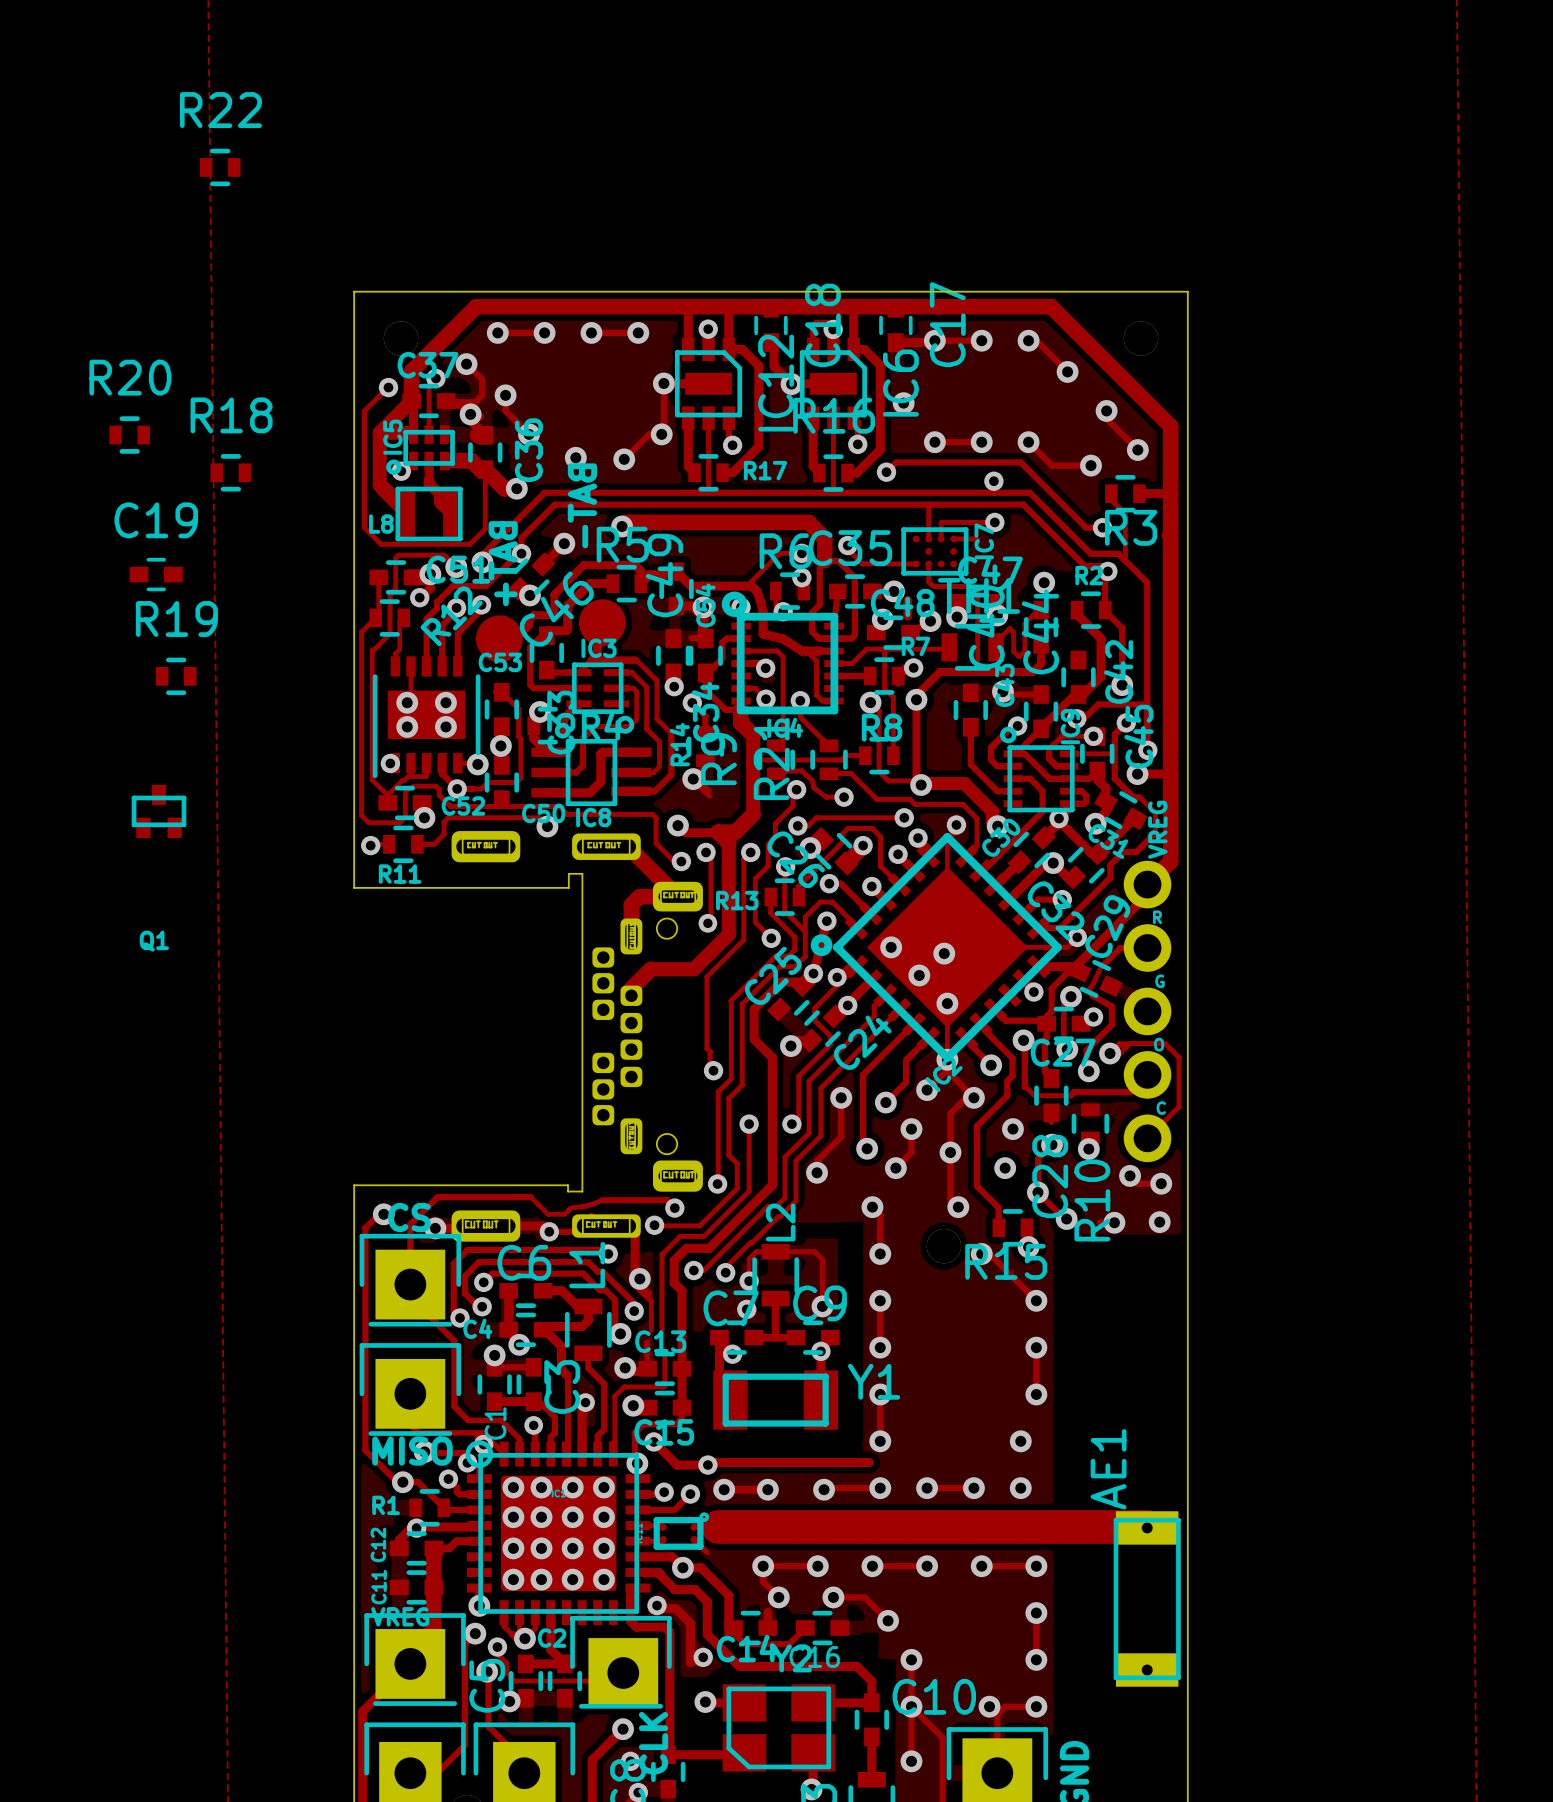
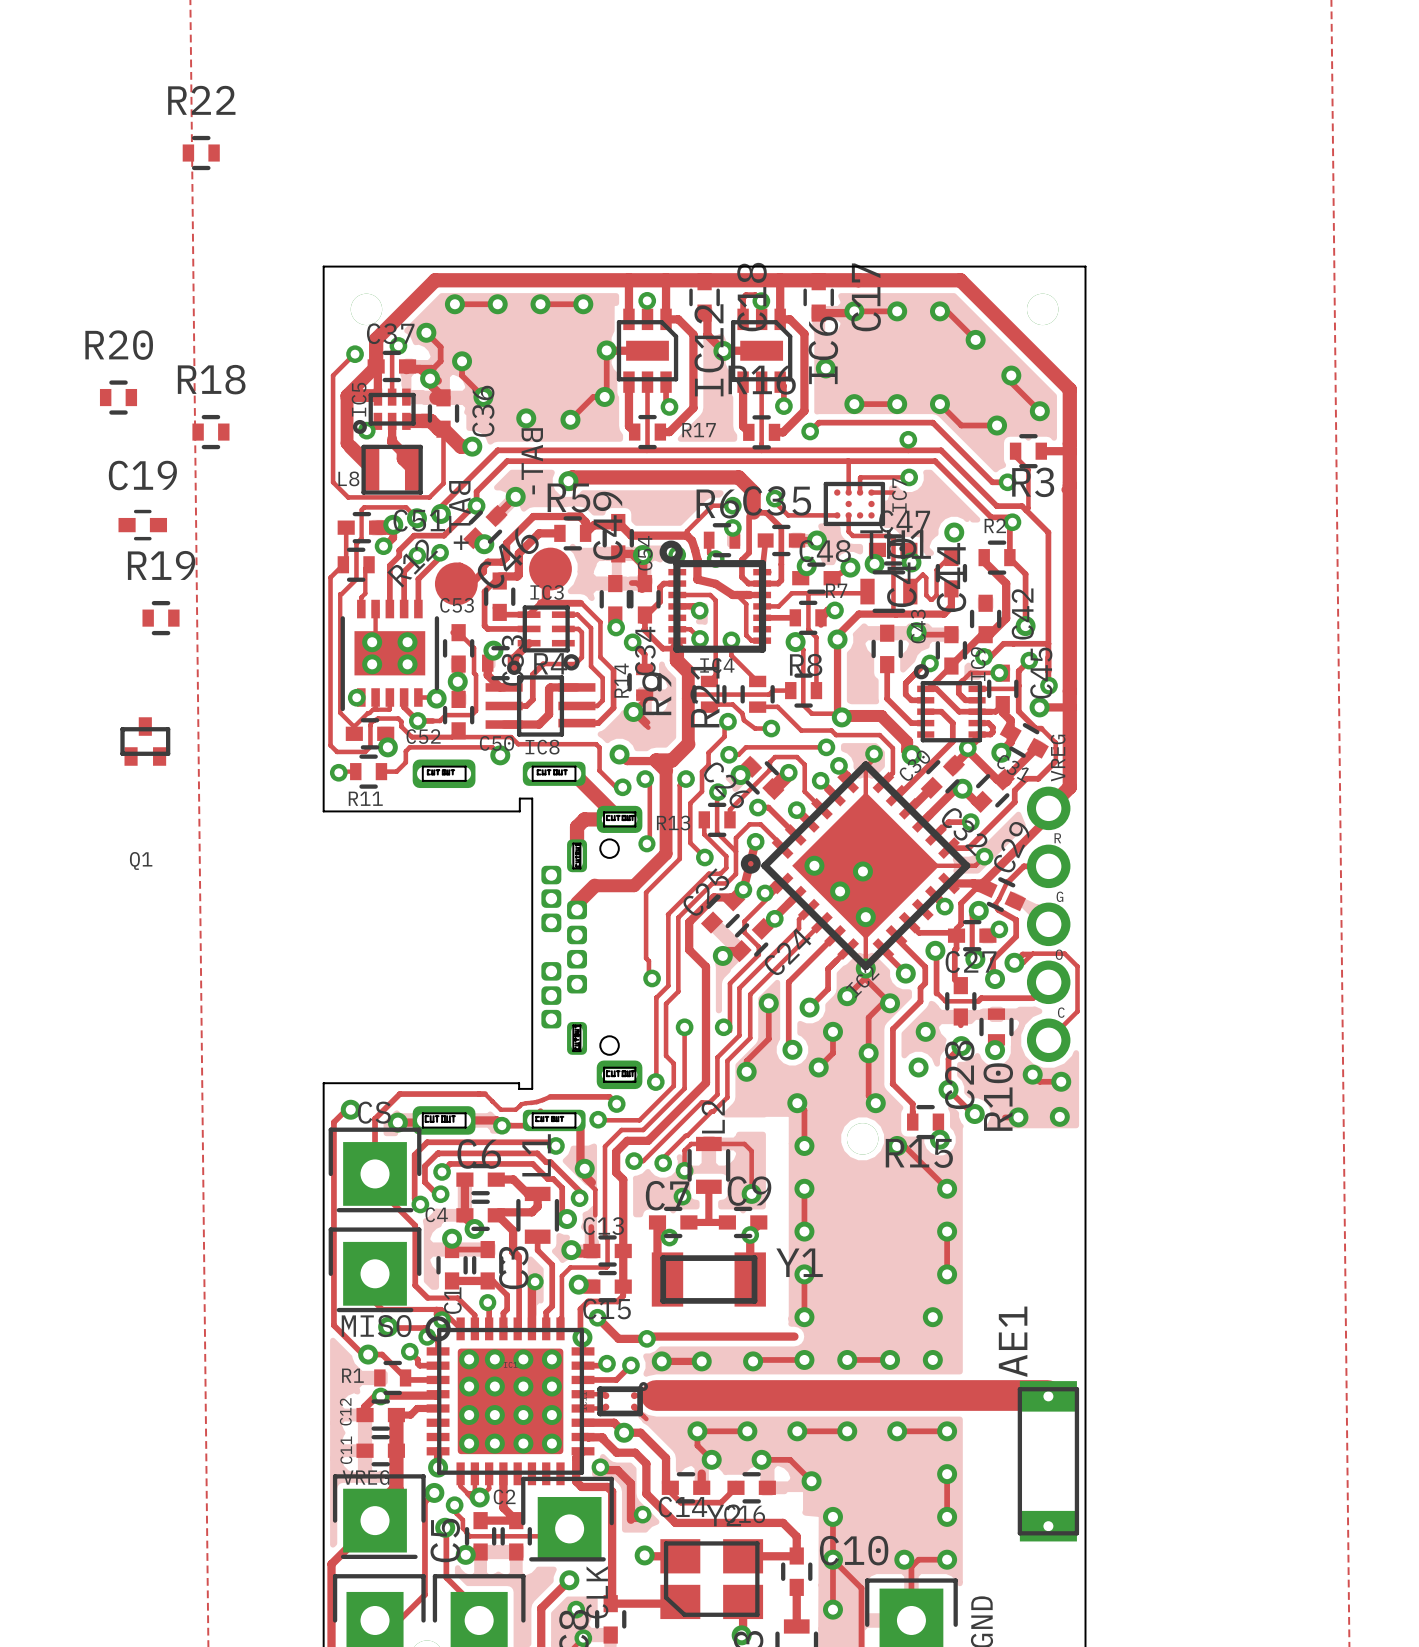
track: (907, 600) (907, 616) -> none

